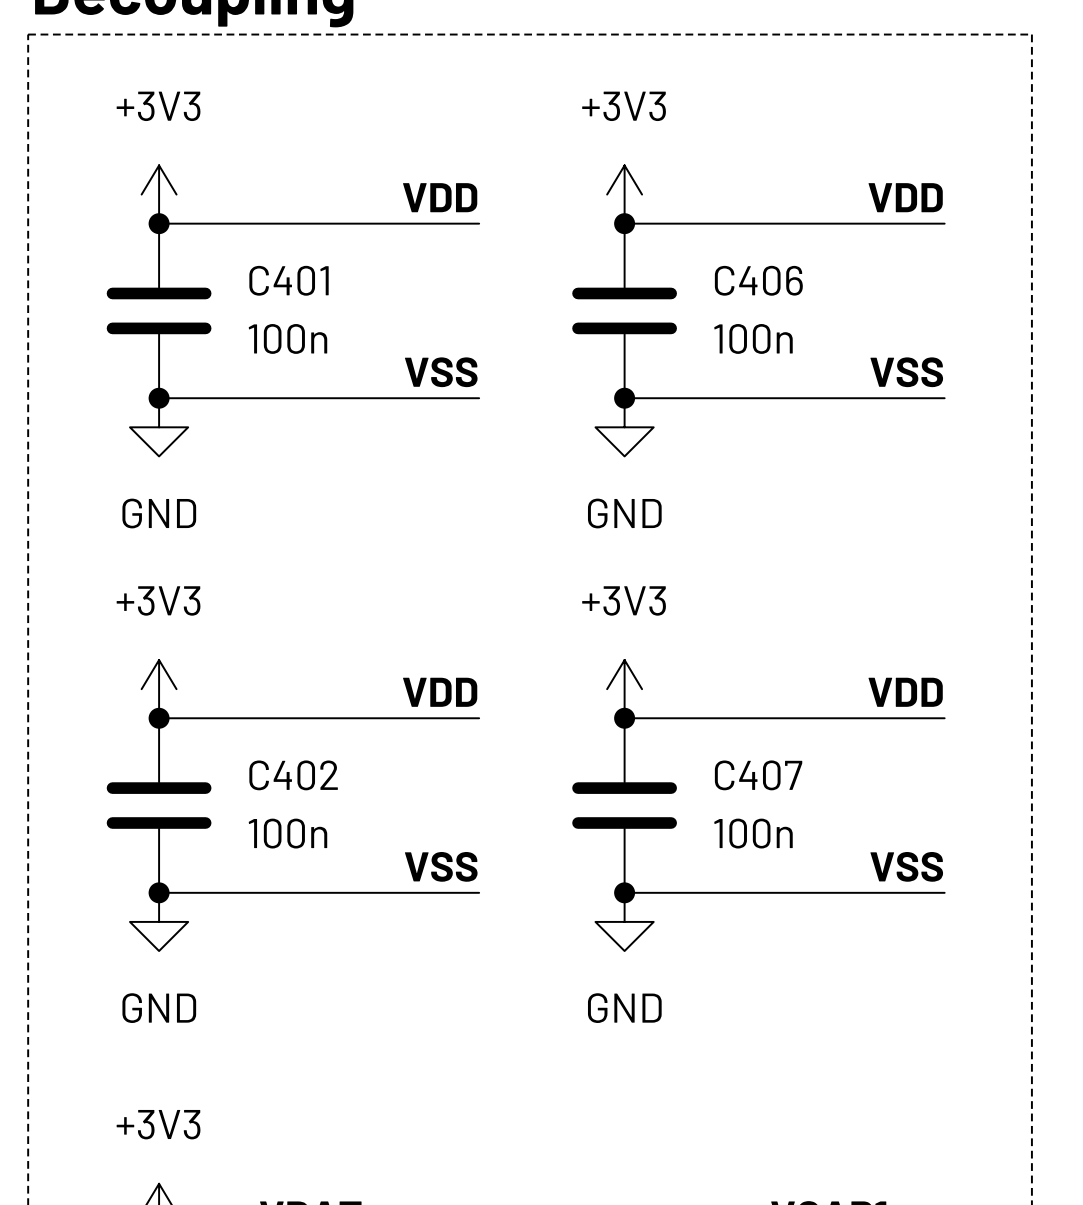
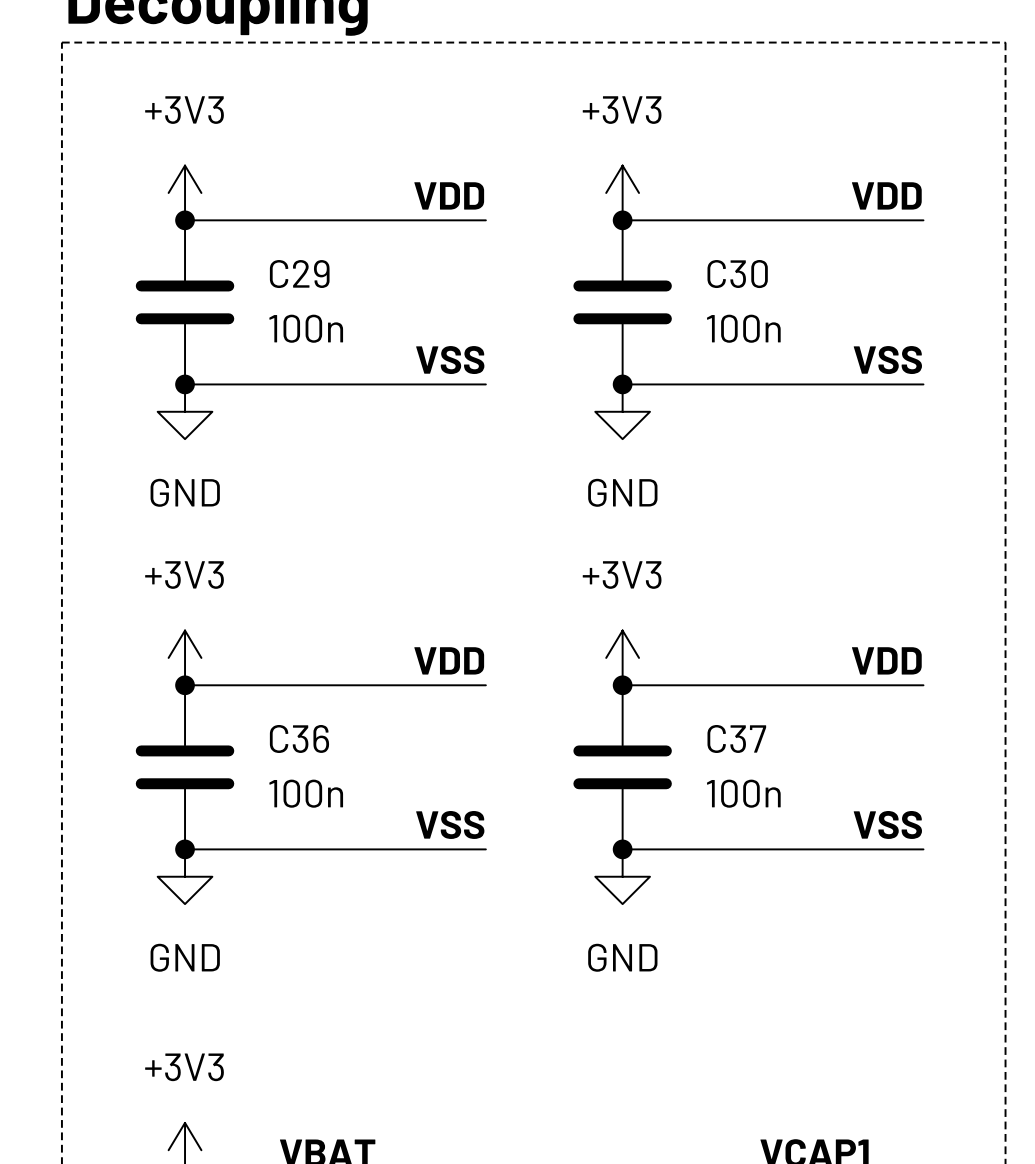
C401 name: C401 (289, 280) -> C29 (299, 274)
C406 name: C406 (758, 280) -> C30 (737, 274)
C402 name: C402 (293, 775) -> C36 (299, 738)
C407 name: C407 (758, 775) -> C37 (736, 738)

